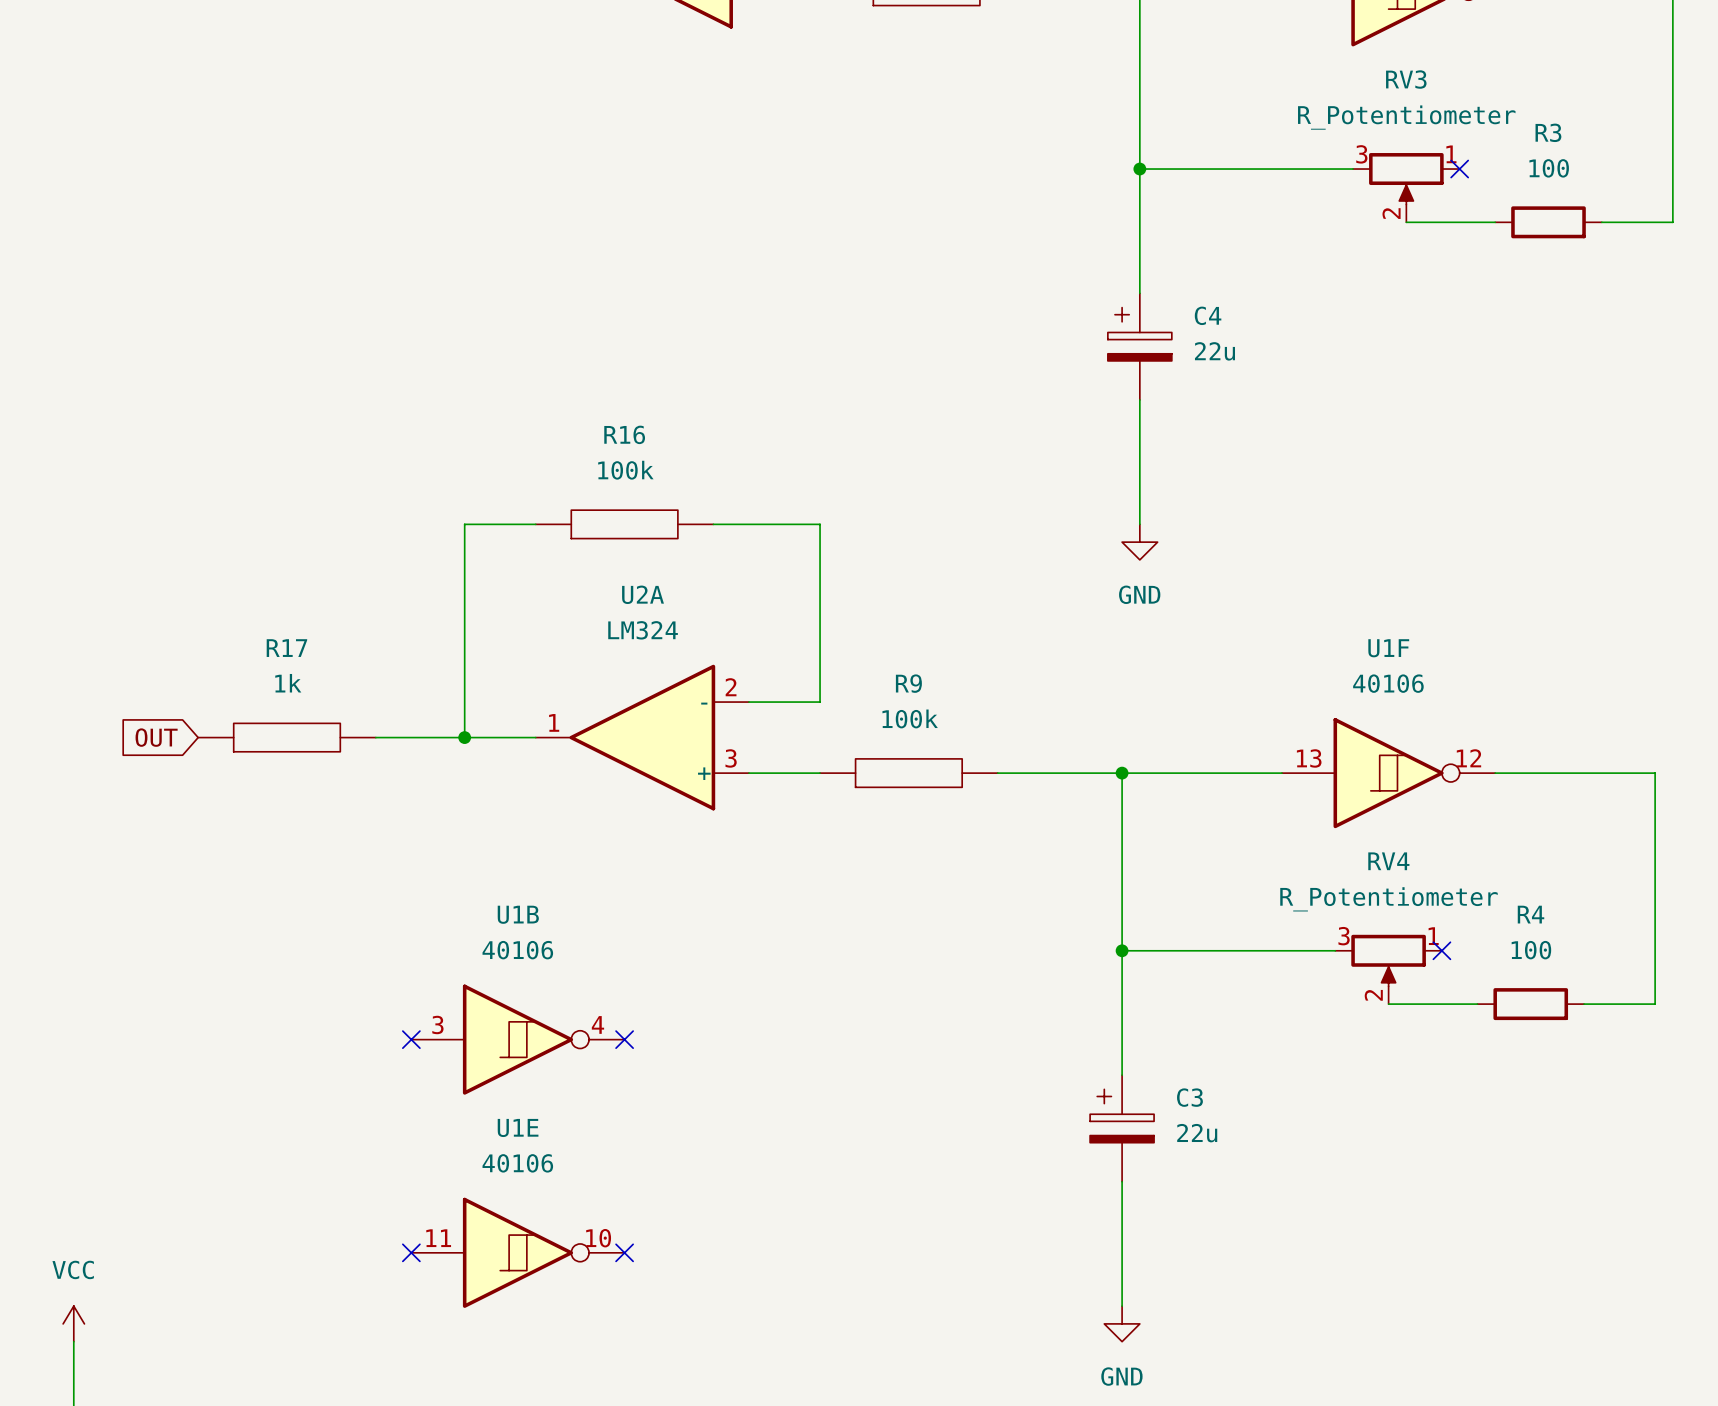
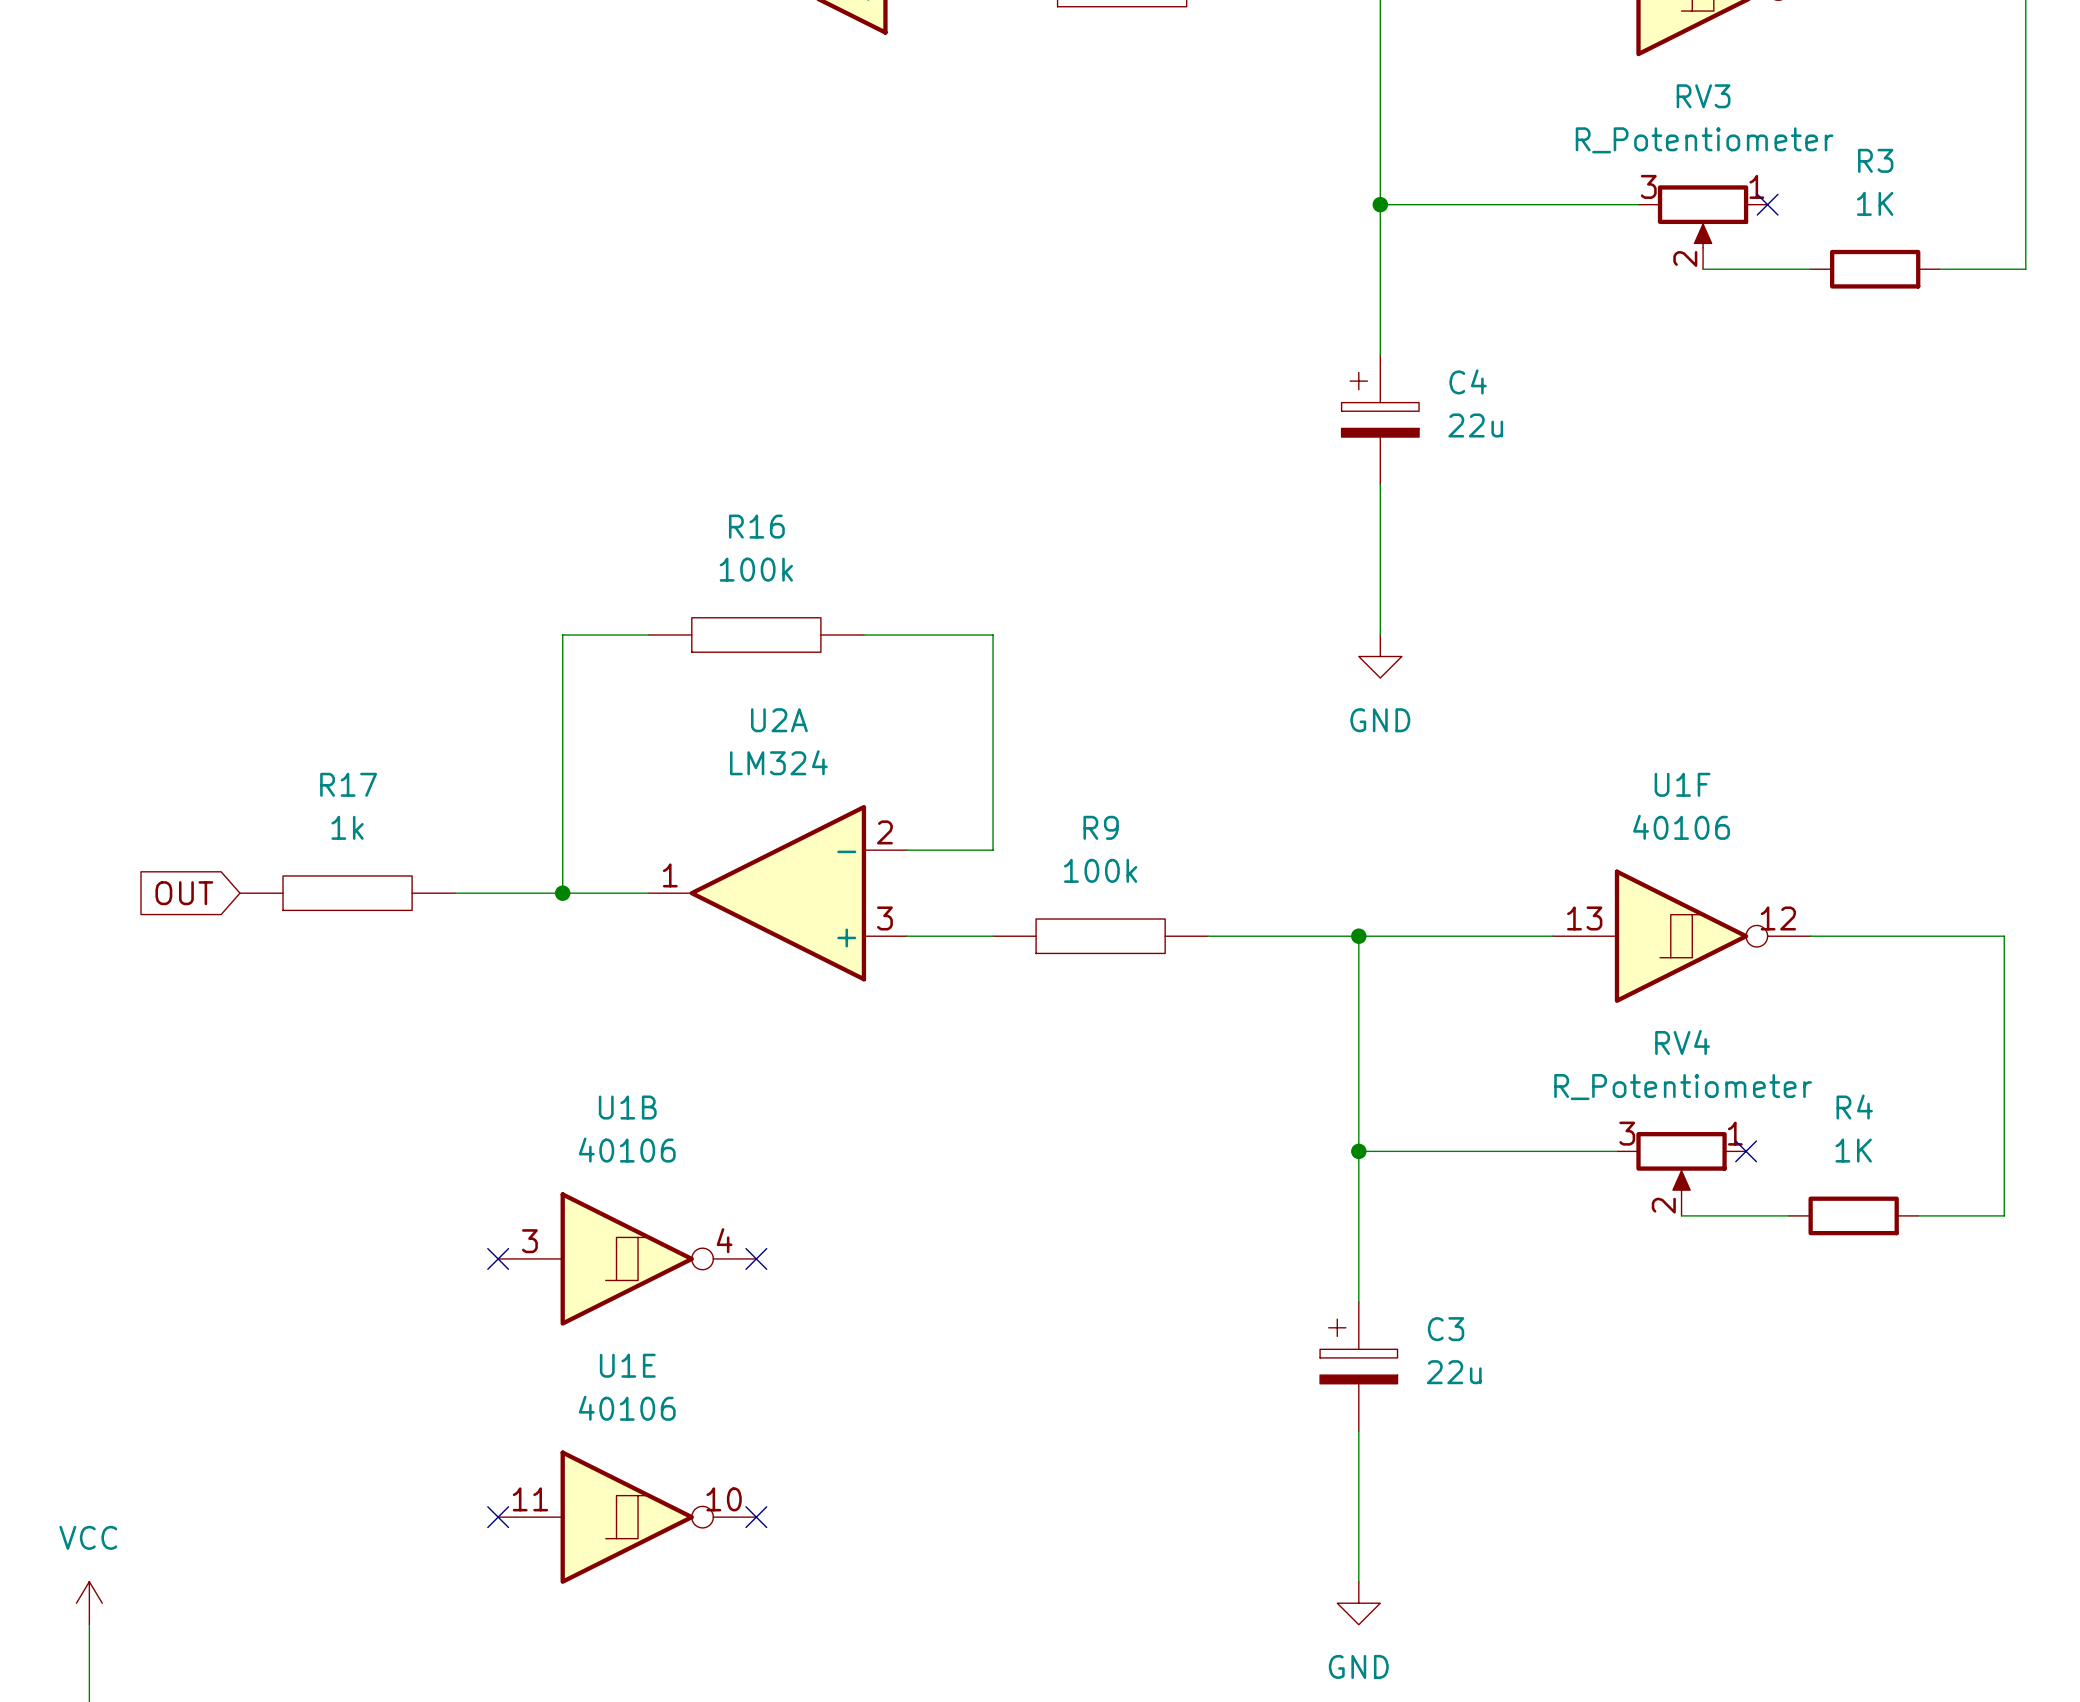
R3 value: 100 (1549, 168) -> 1K (1875, 203)
R4 value: 100 (1531, 950) -> 1K (1853, 1150)

